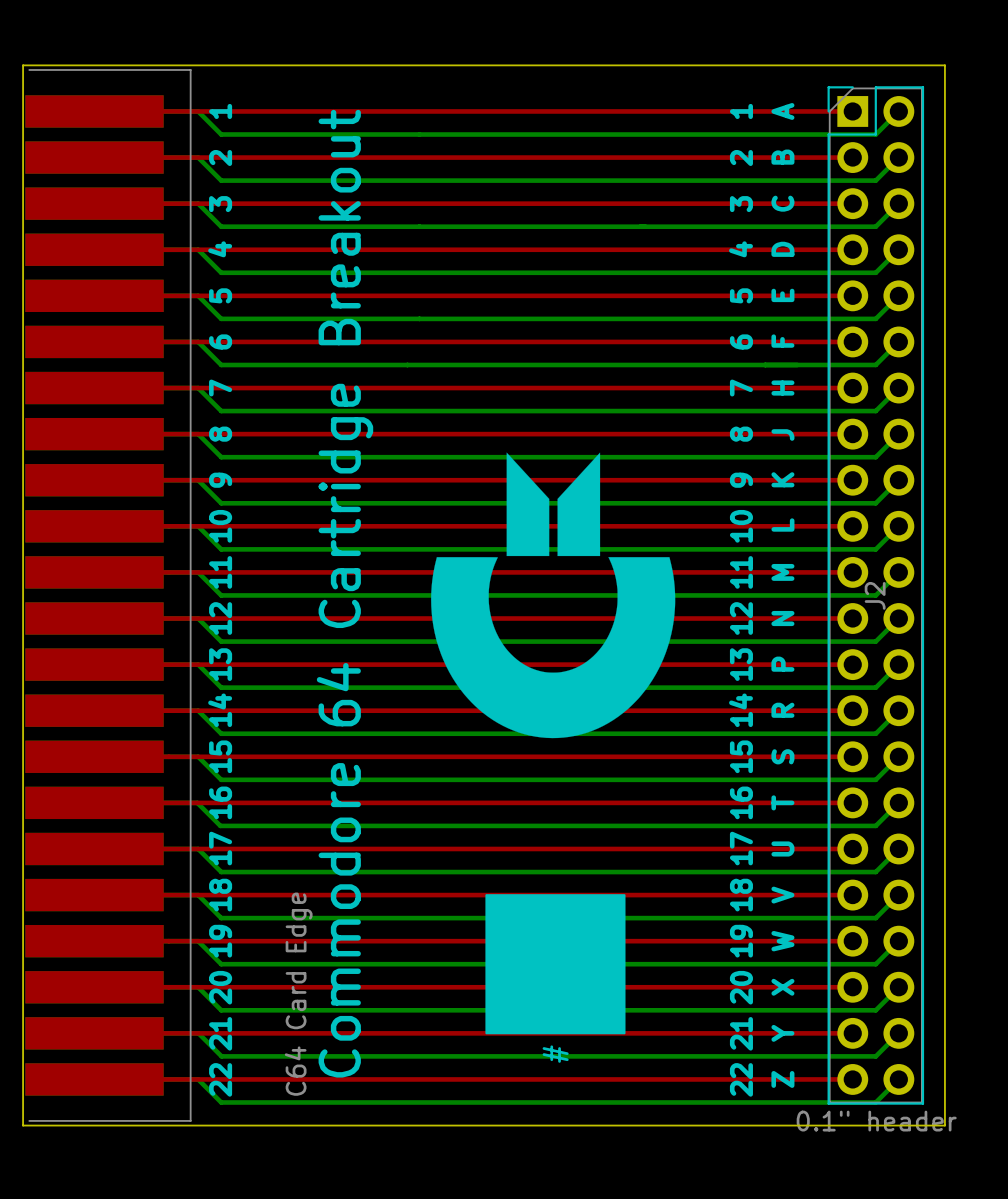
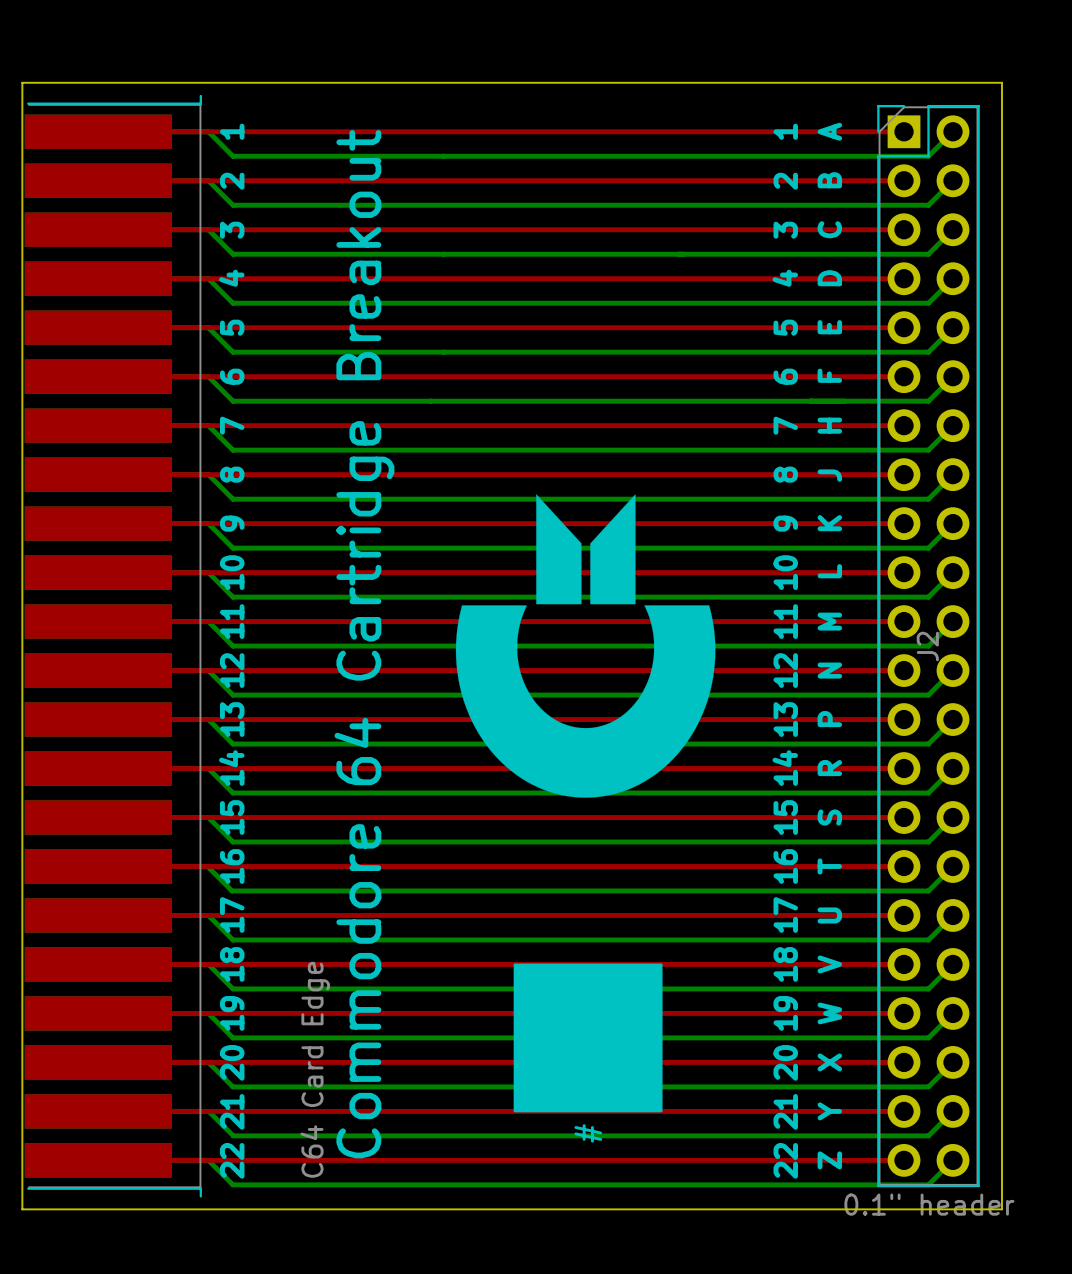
part footprint: [25, 69, 192, 1122] -> [24, 94, 202, 1198]

